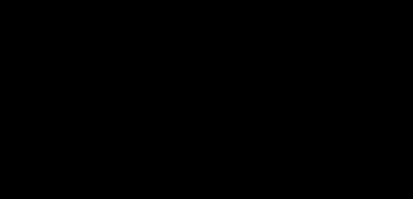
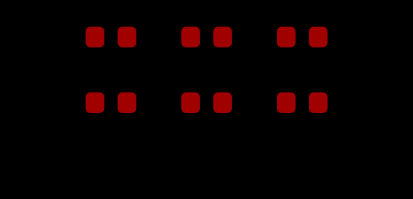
part: none -> (110, 37)
part: none -> (206, 37)
part: none -> (302, 37)
part: none -> (110, 102)
part: none -> (206, 102)
part: none -> (302, 102)

